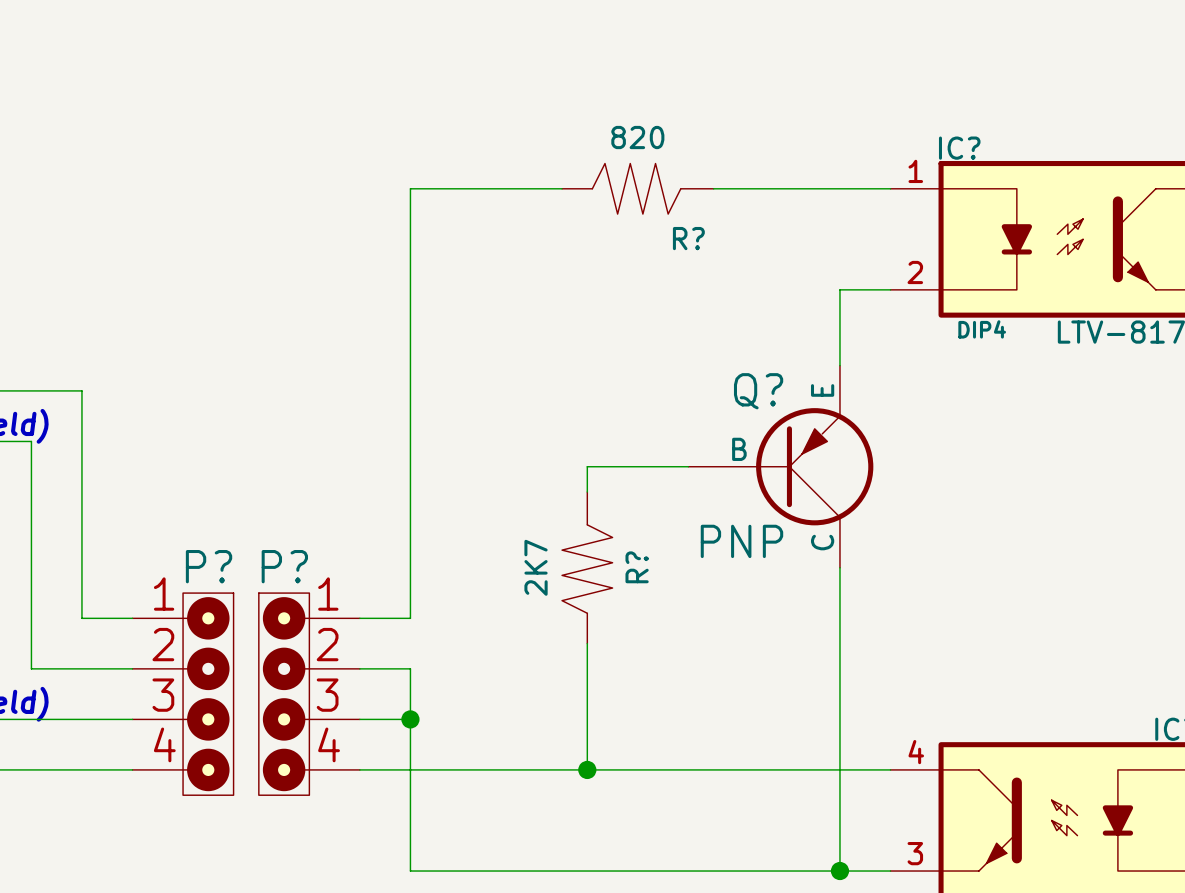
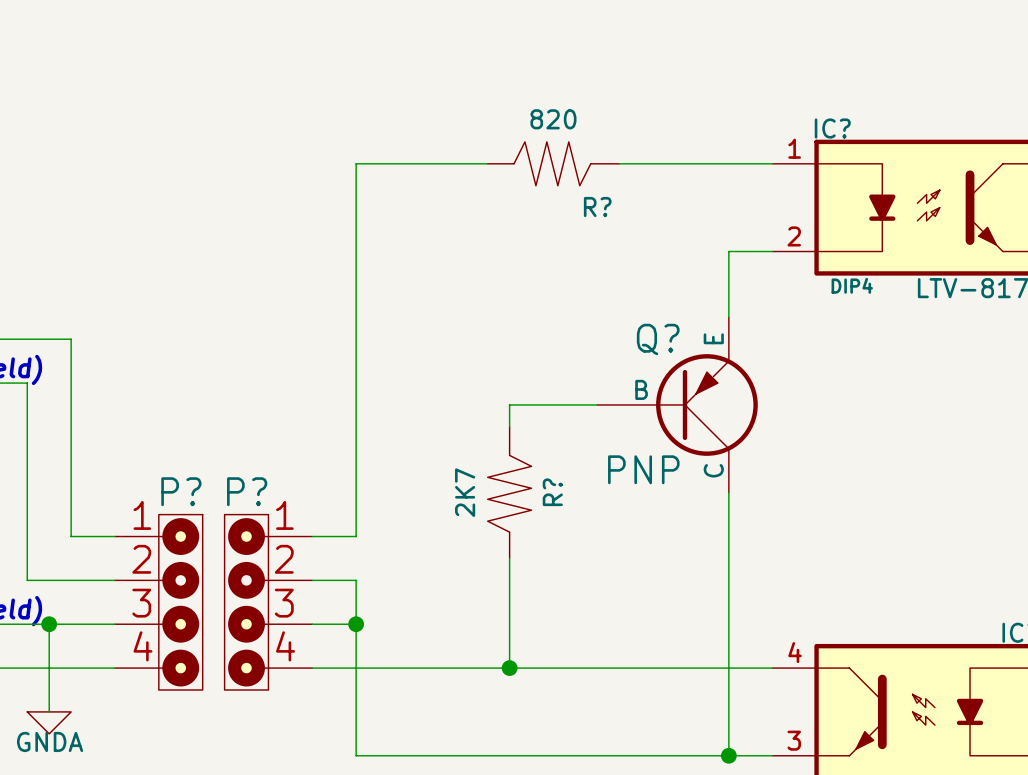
wire: none -> (49, 624) (49, 711)
junction: none -> (49, 624)
power symbol: none -> GNDA (49, 722)

